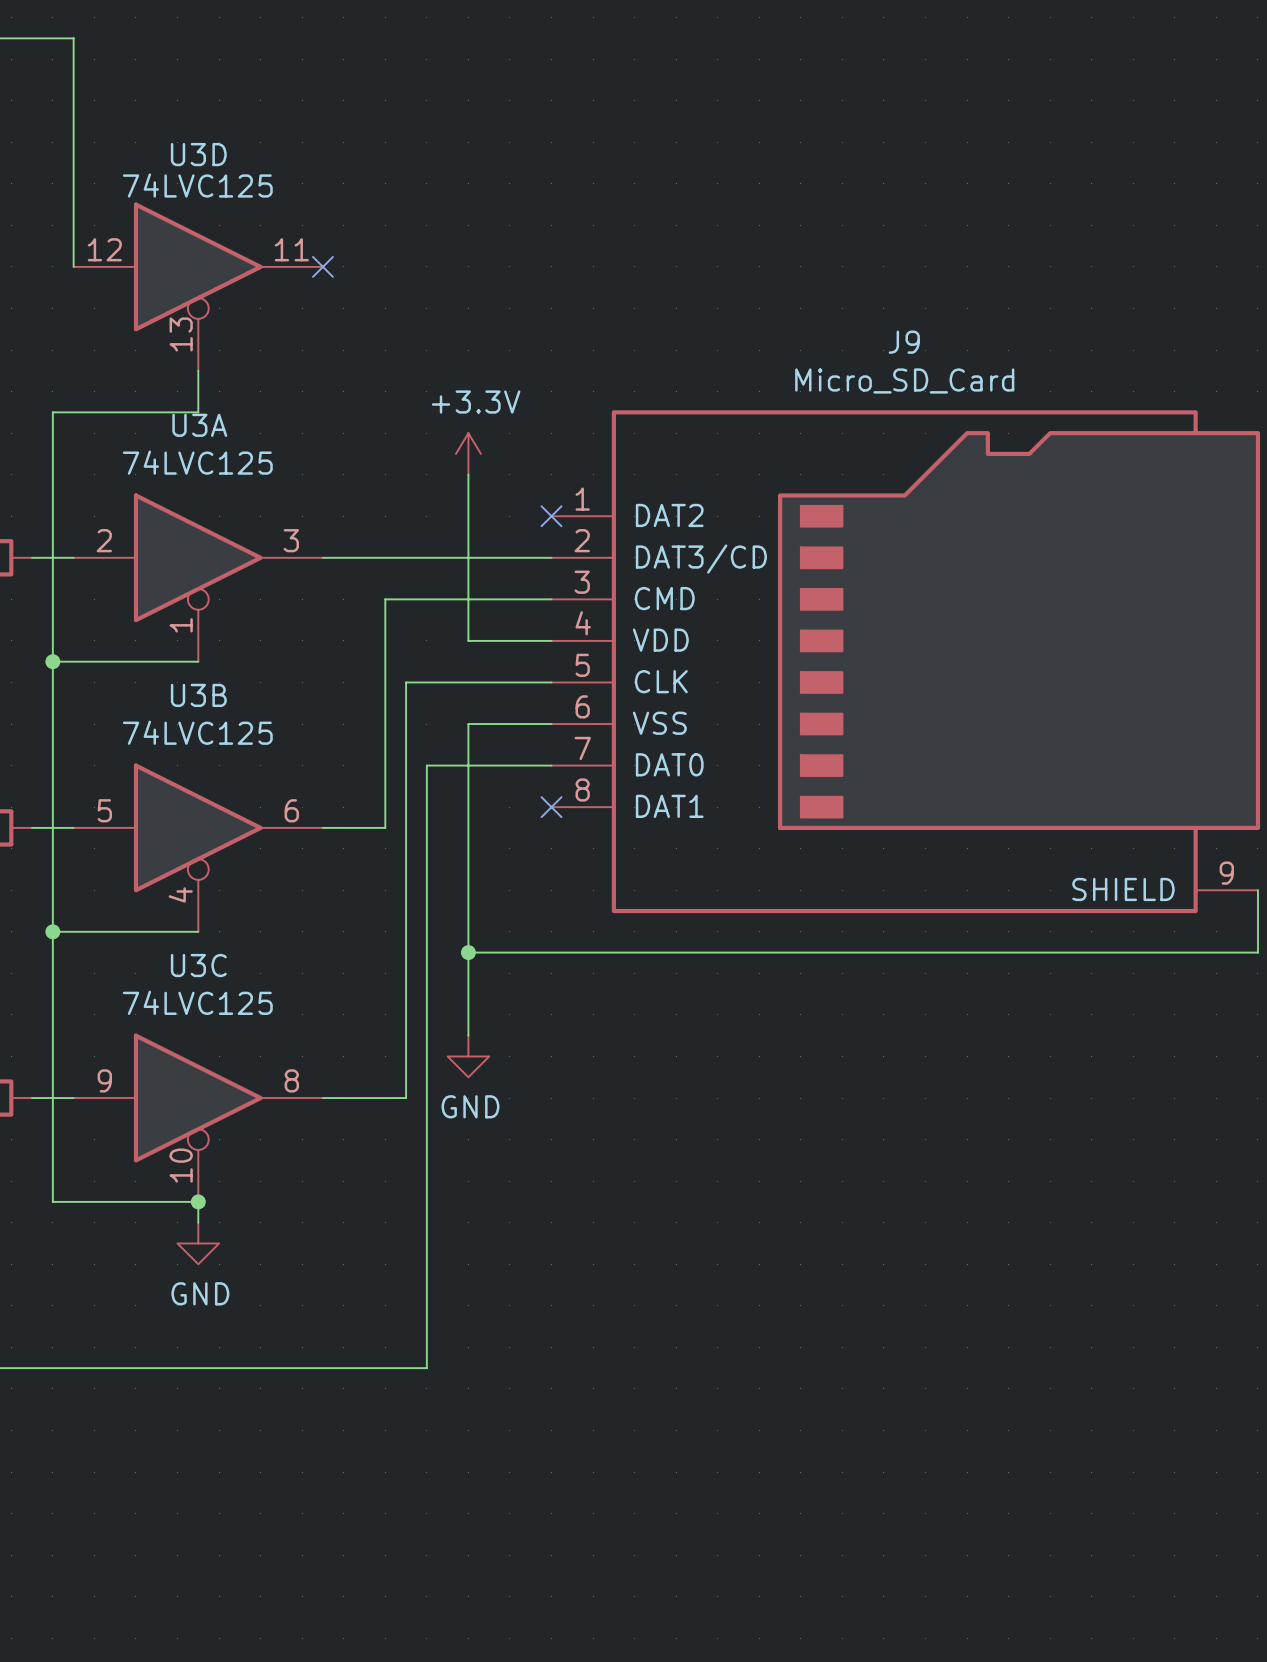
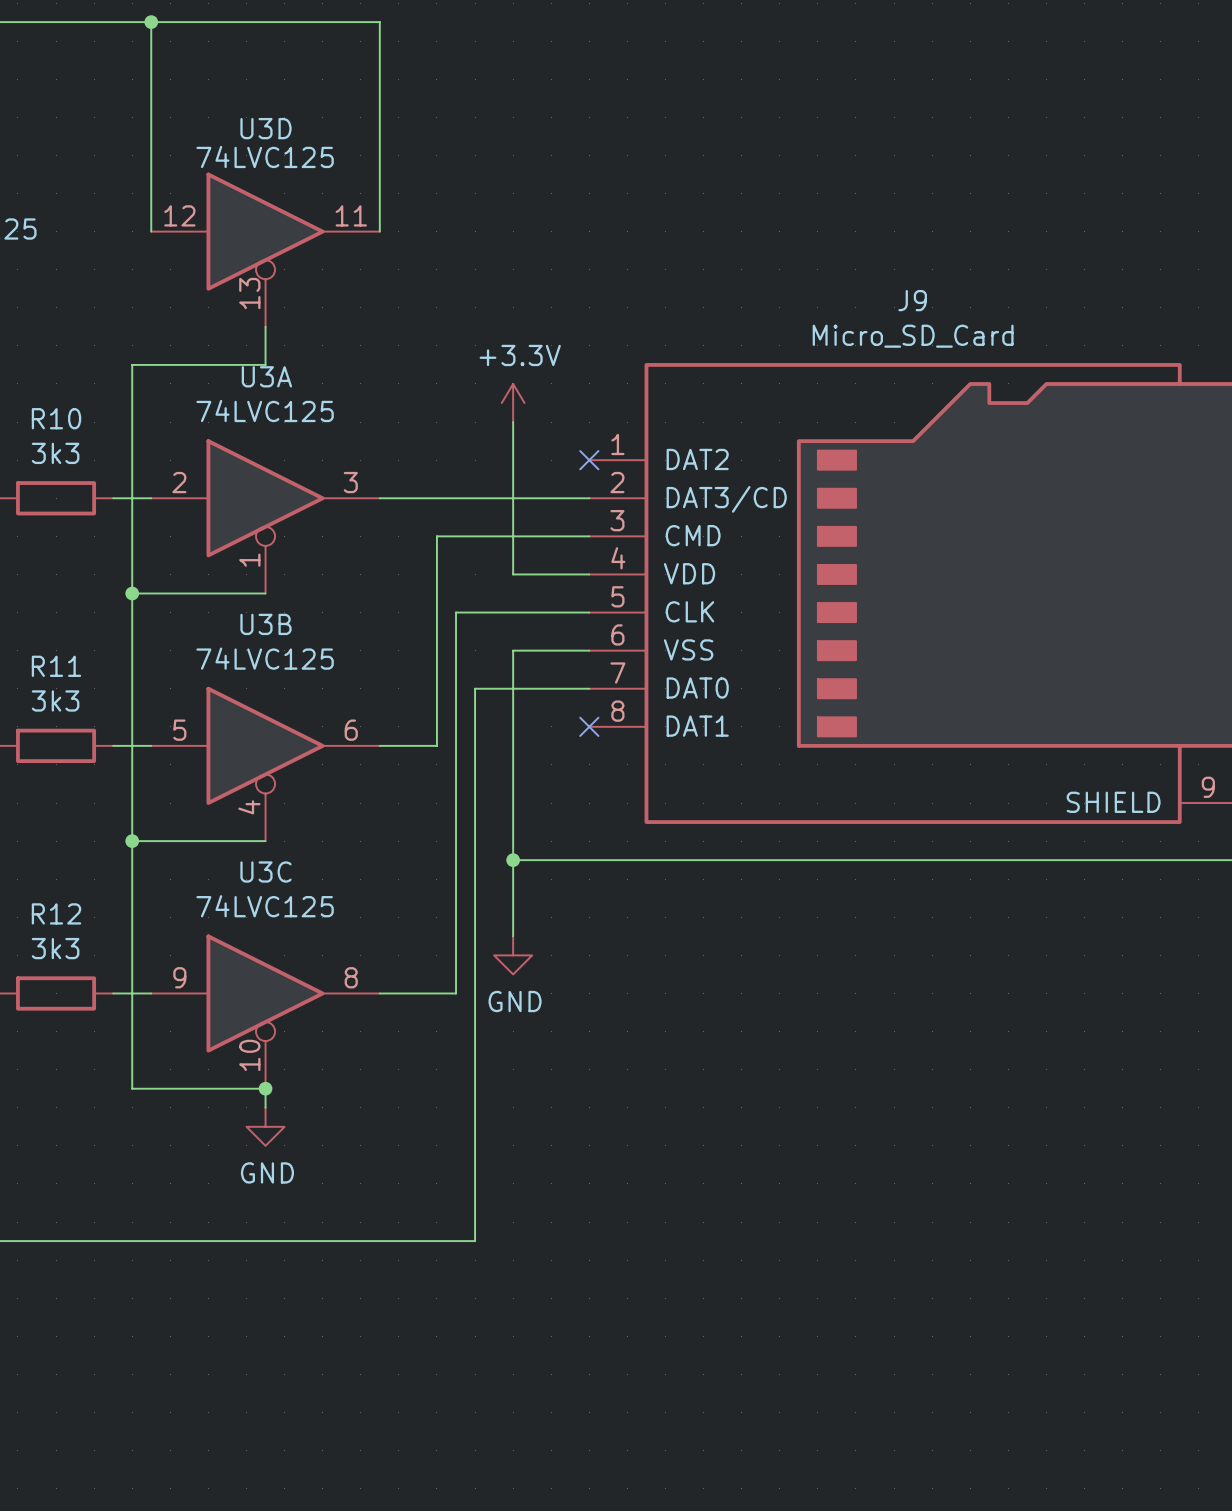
wire: none -> (151, 22) (379, 22) (379, 231)
junction: none -> (151, 22)
no-connect mark: (322, 266) -> none

